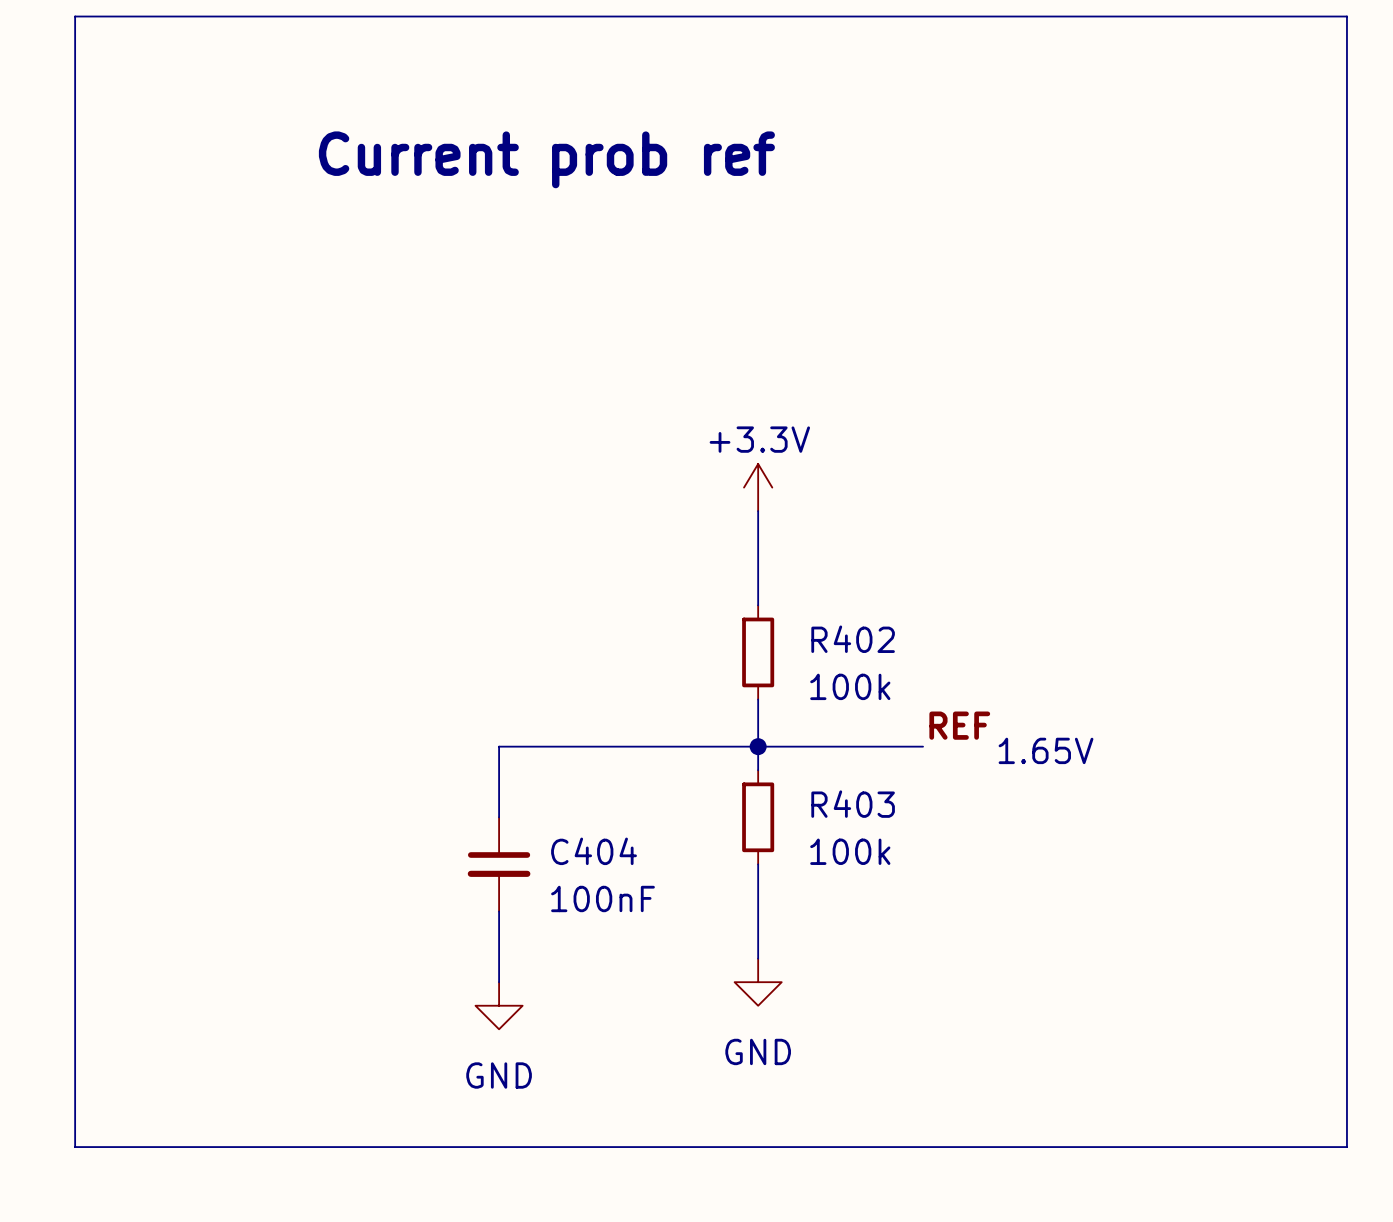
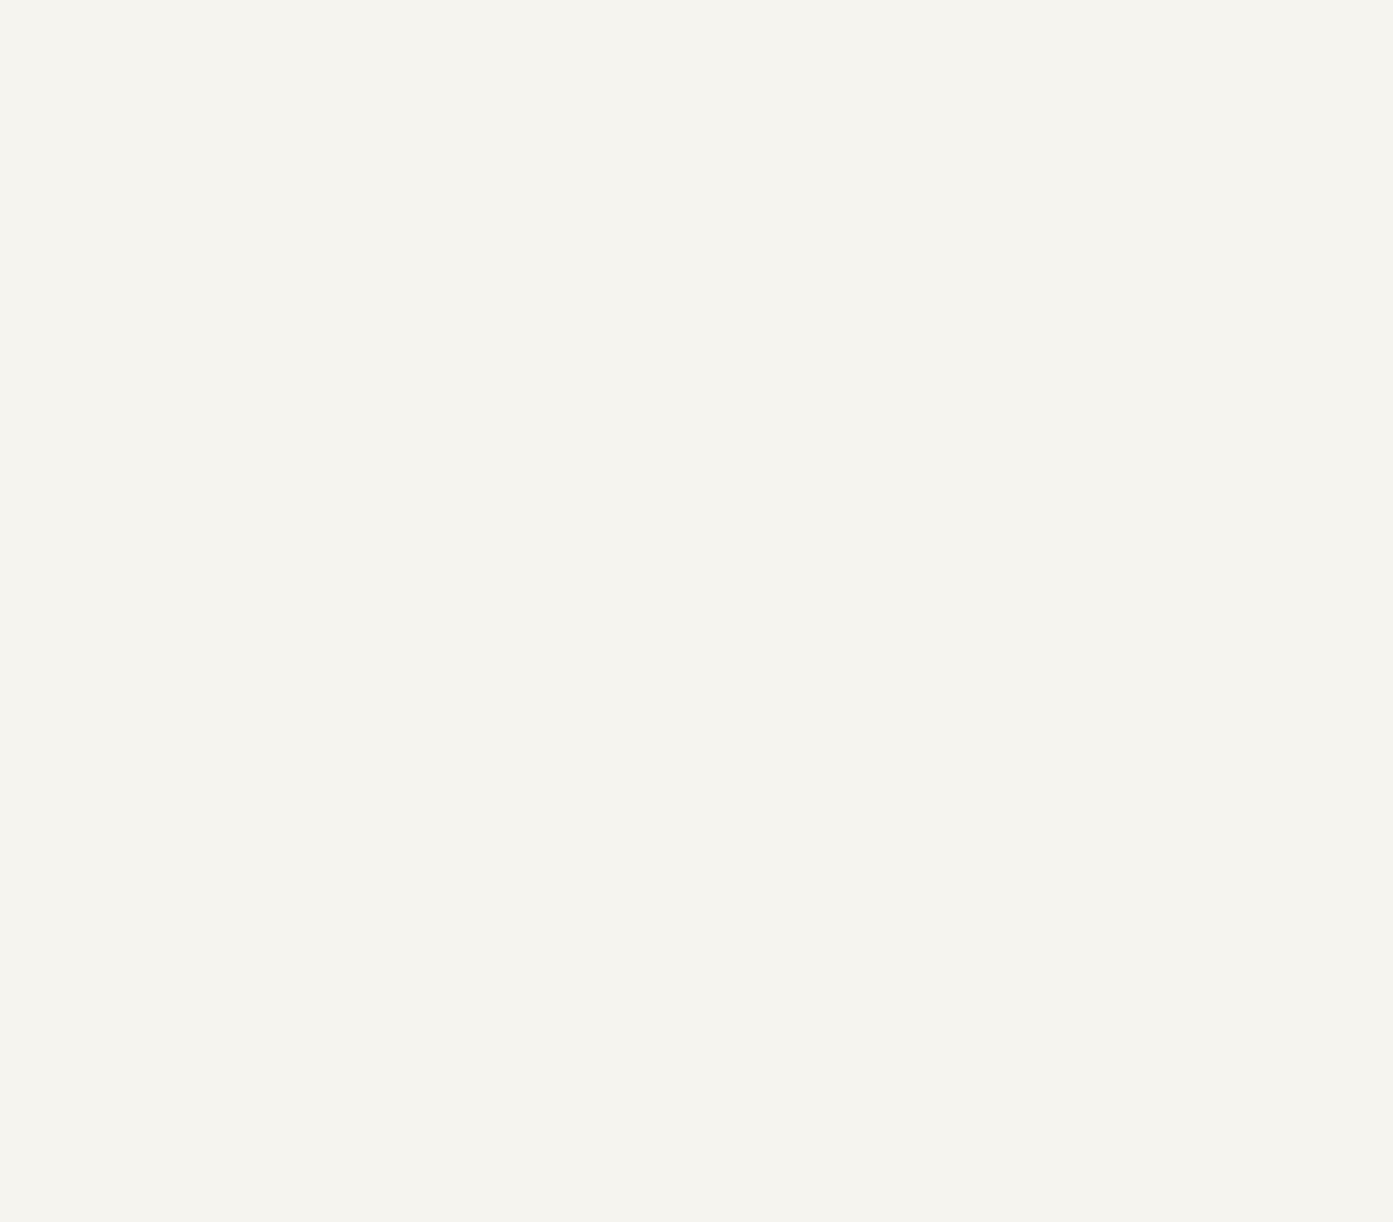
line: (75, 16) (1346, 16) (1346, 1147) (75, 1147) (75, 16) -> none
text: Current prob ref (546, 159) -> none
power symbol: +3.3V (758, 487) -> none
wire: (758, 511) (758, 605) -> none
R402: 100k (758, 652) -> none
wire: (758, 699) (758, 770) -> none
label: REF (959, 725) -> none
junction: (758, 746) -> none
wire: (923, 746) (499, 746) (499, 817) -> none
text: 1.65V (1046, 750) -> none
R403: 100k (758, 817) -> none
C404: 100nF (499, 864) -> none
wire: (758, 864) (758, 958) -> none
wire: (499, 911) (499, 982) -> none
power symbol: GND (758, 982) -> none
power symbol: GND (499, 1005) -> none

